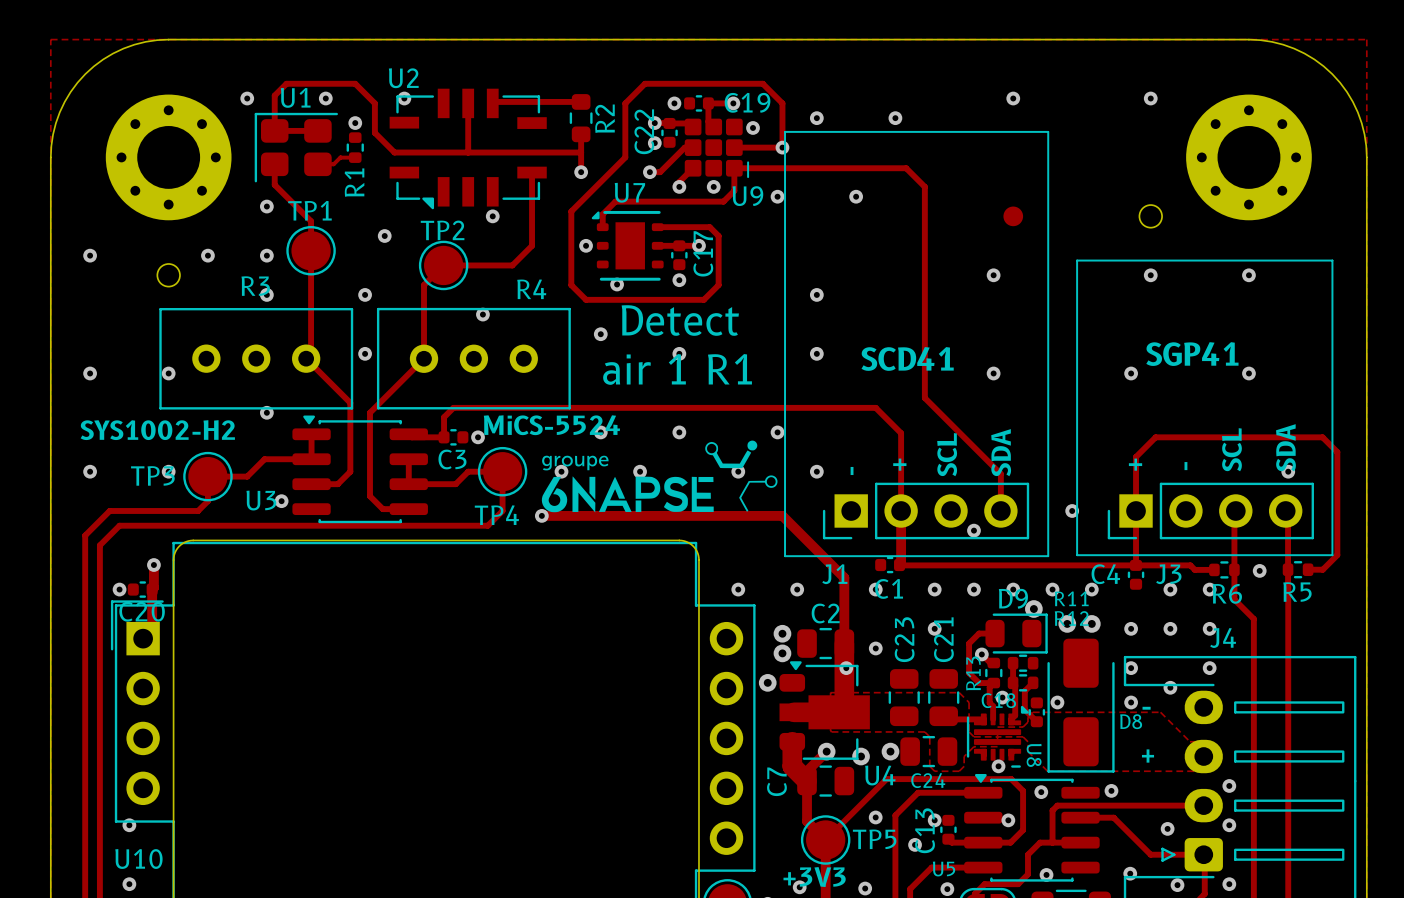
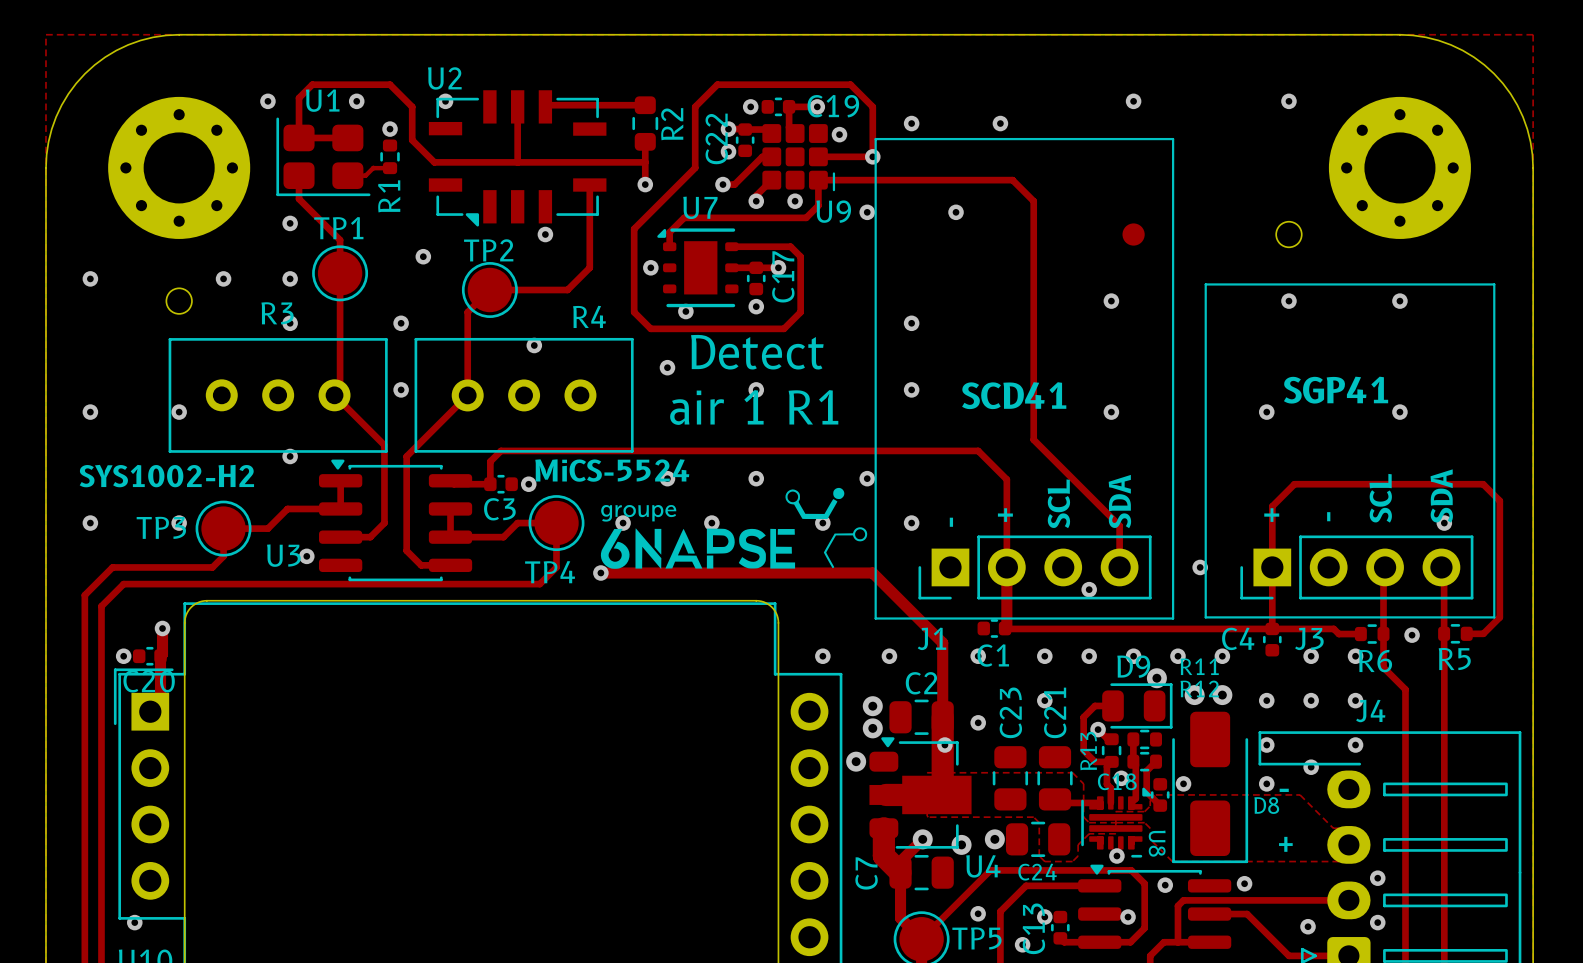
U1 footprint: [254, 112, 338, 183] -> [276, 117, 371, 197]

